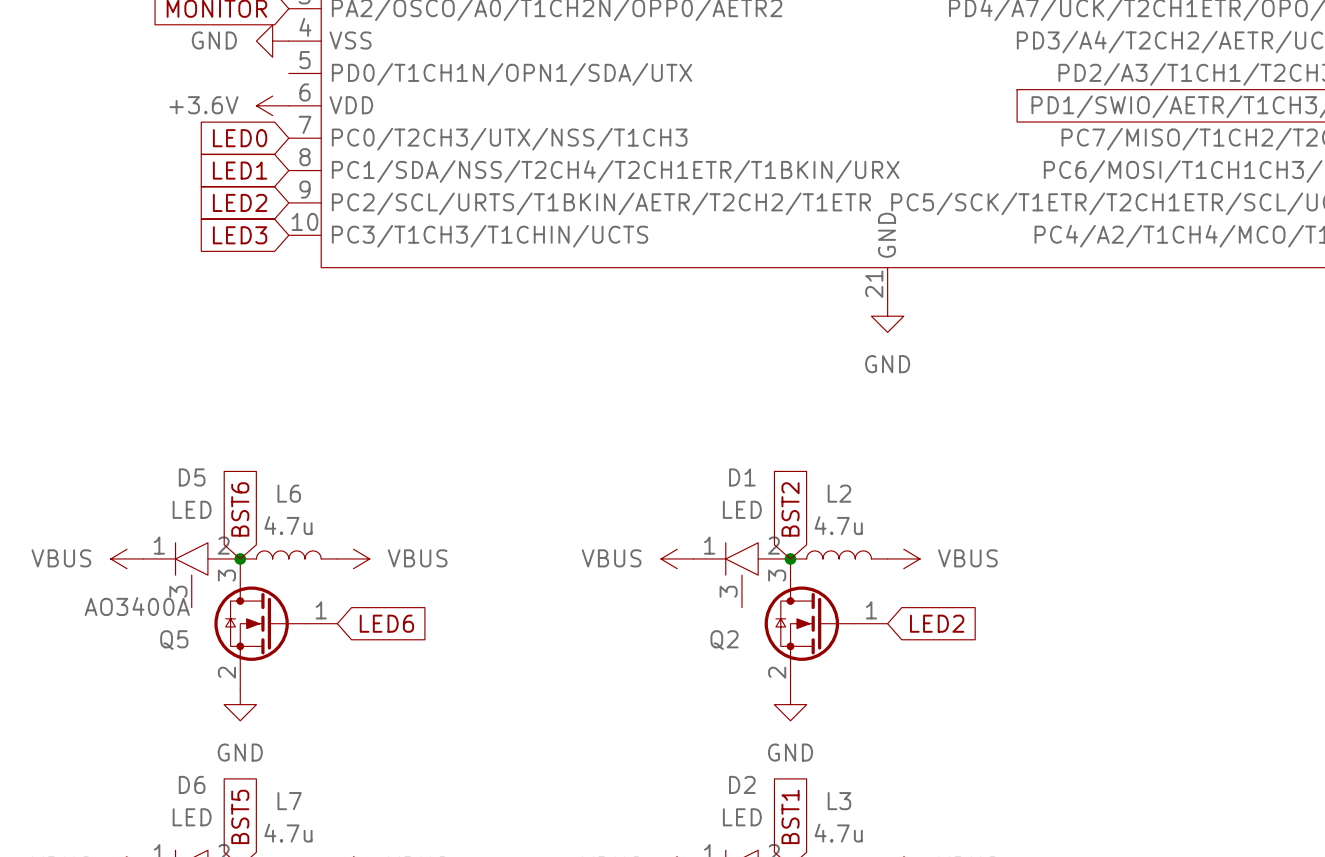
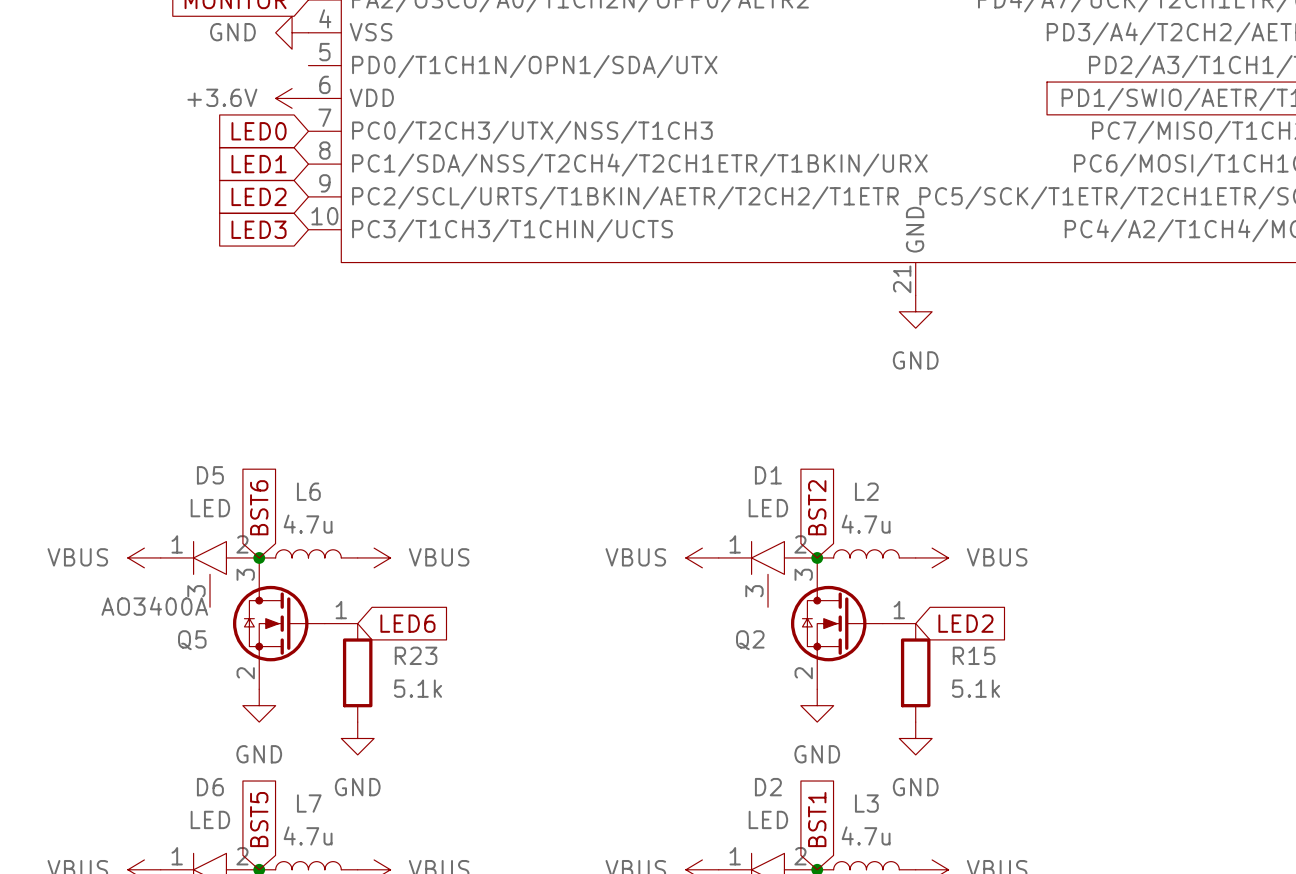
R23: none -> 5.1k (357, 672)
R15: none -> 5.1k (915, 672)
power symbol: none -> GND (357, 738)
power symbol: none -> GND (915, 738)

